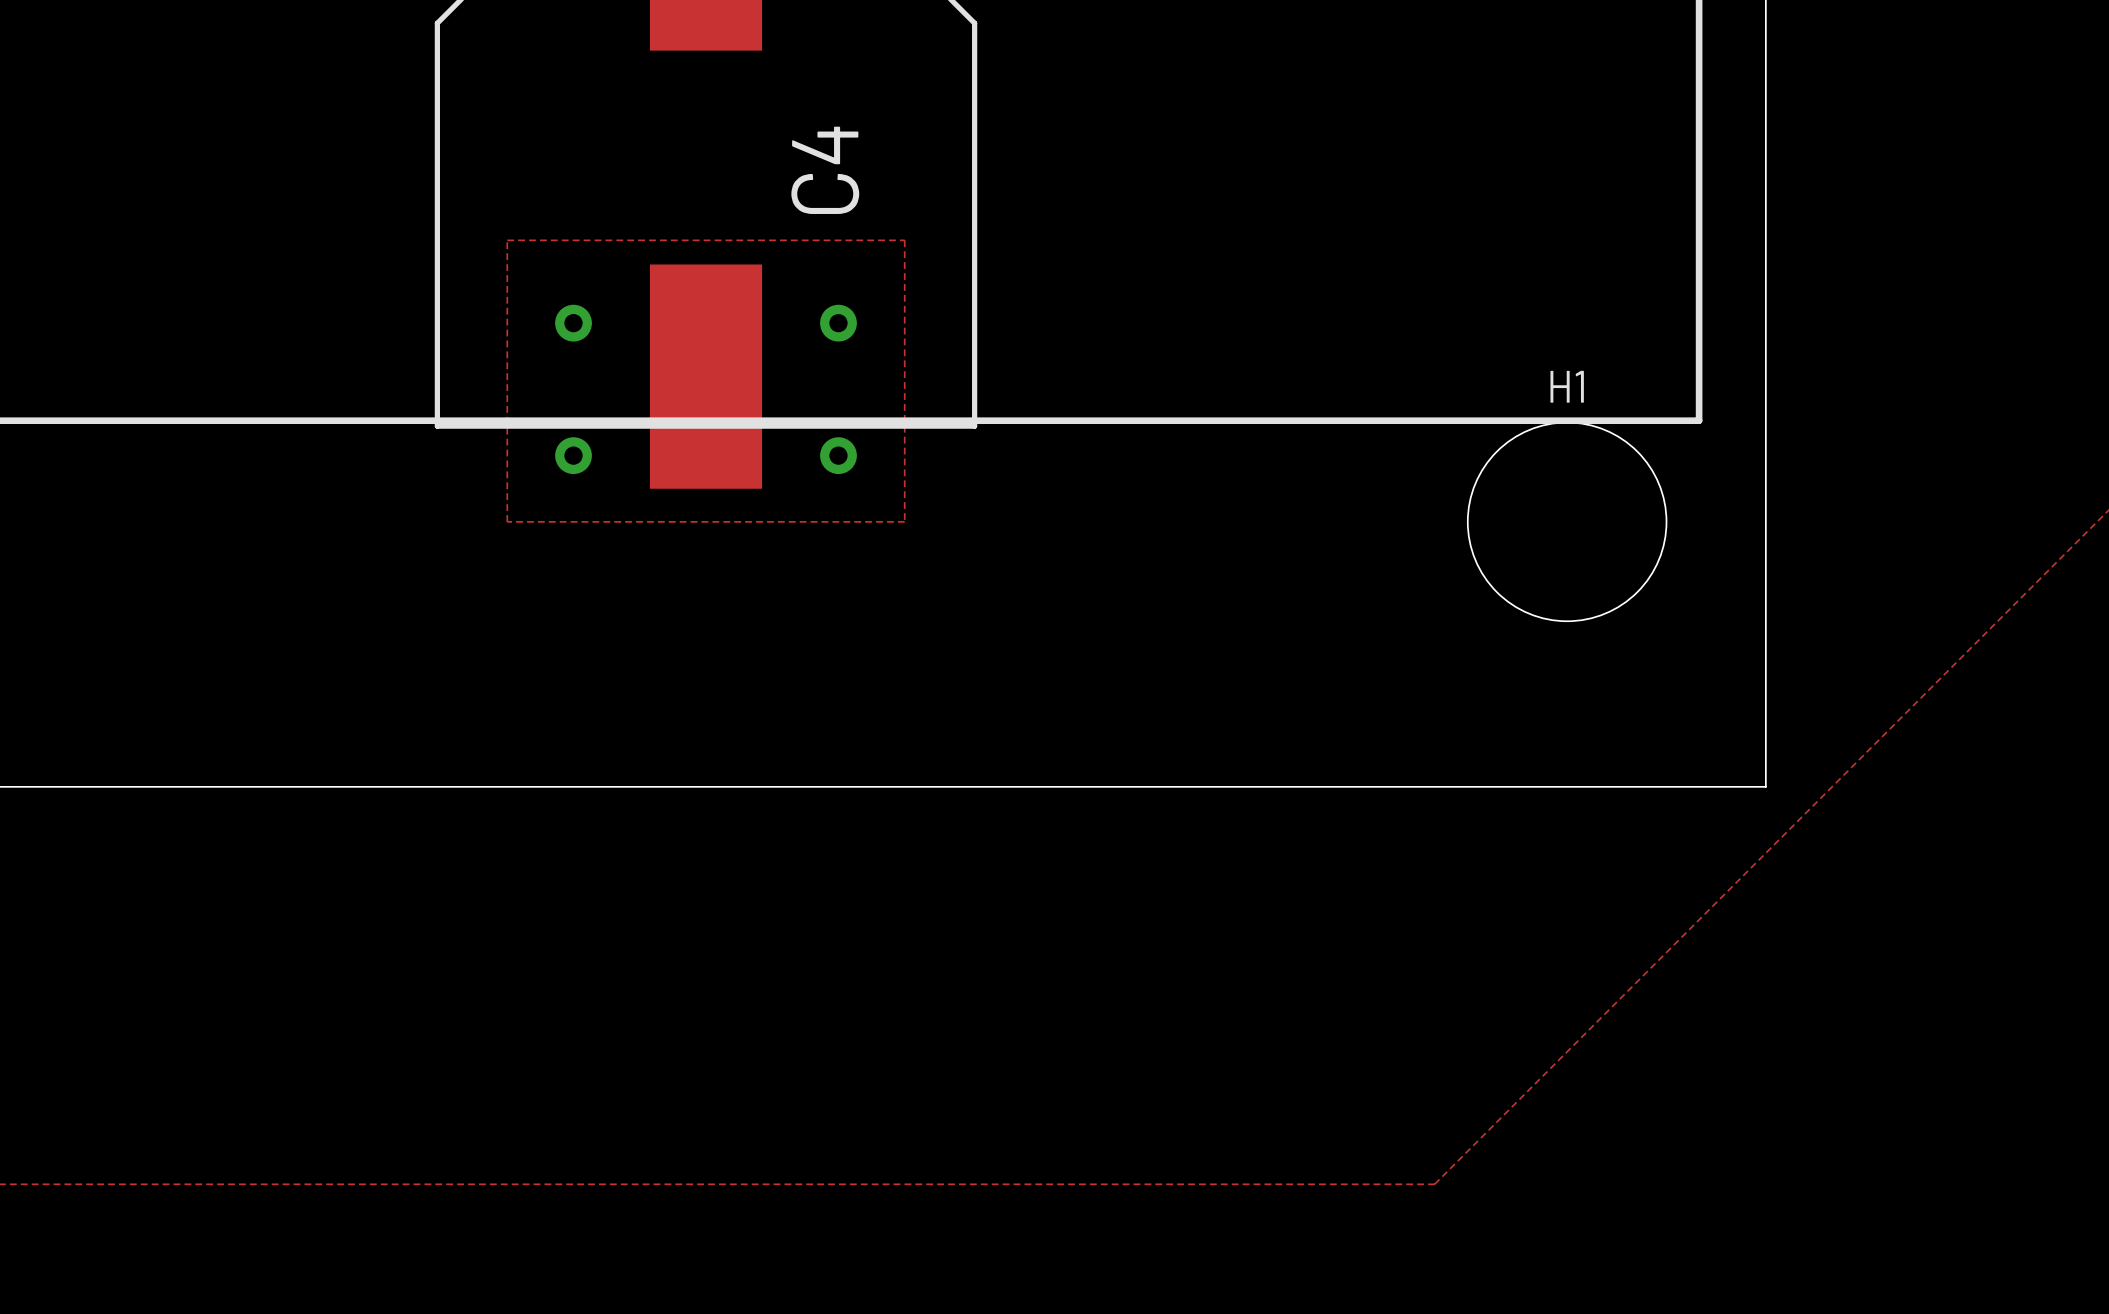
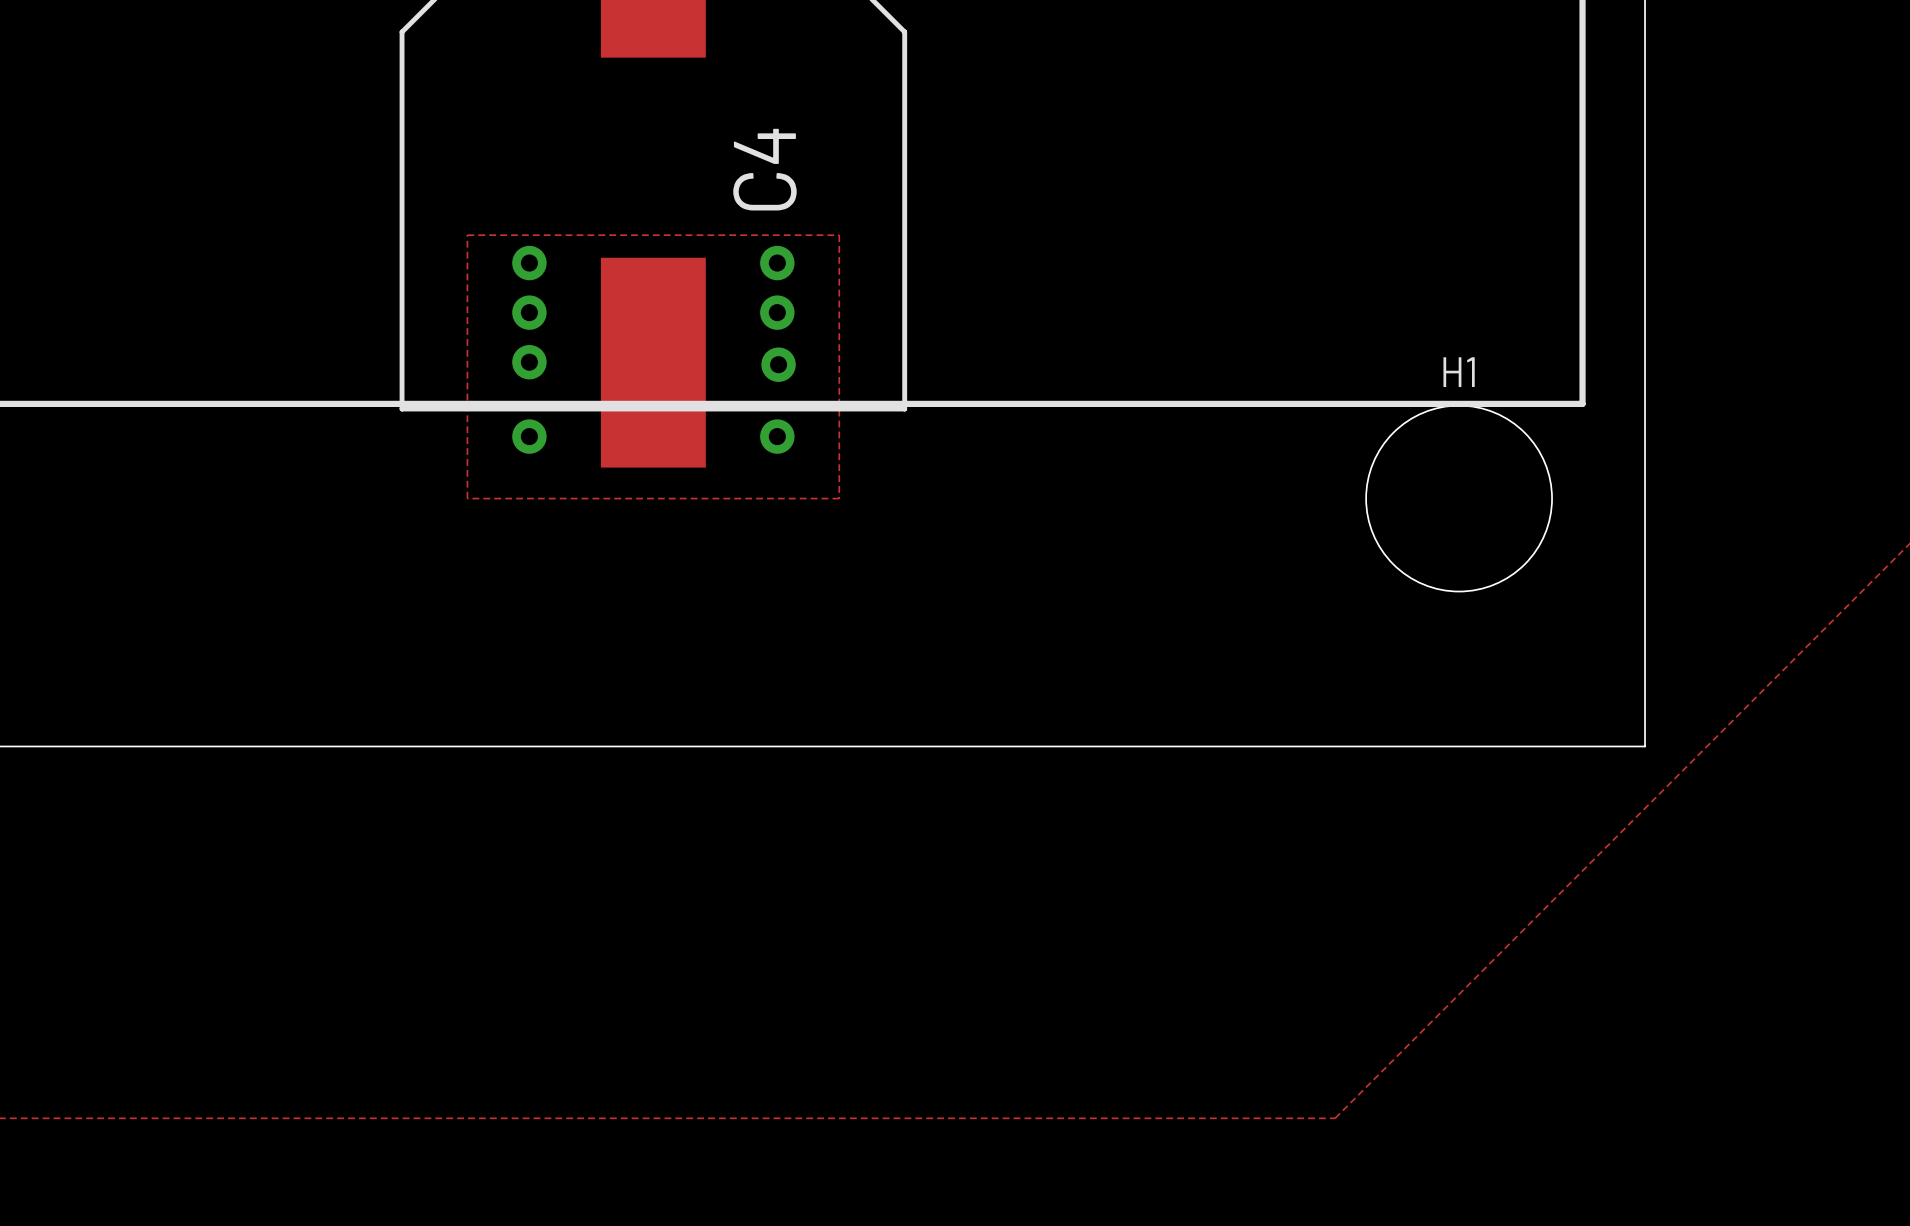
via: none -> (529, 263)
via: none -> (777, 263)
via: none -> (529, 362)
via: none -> (778, 364)

